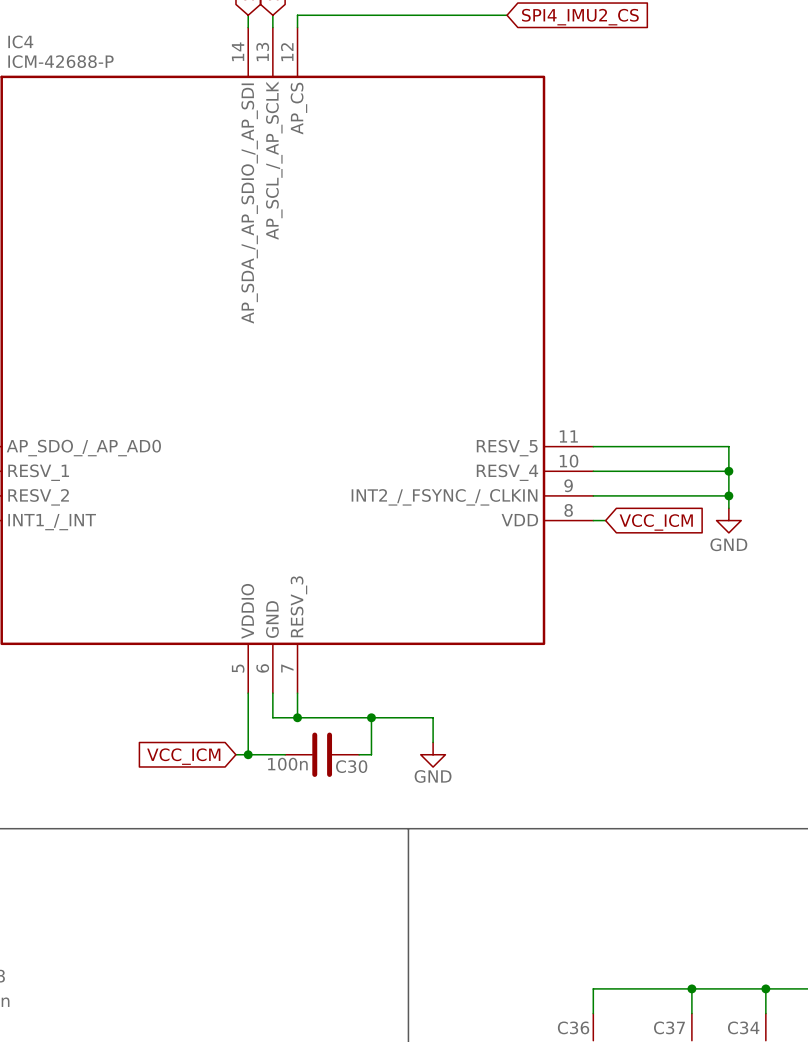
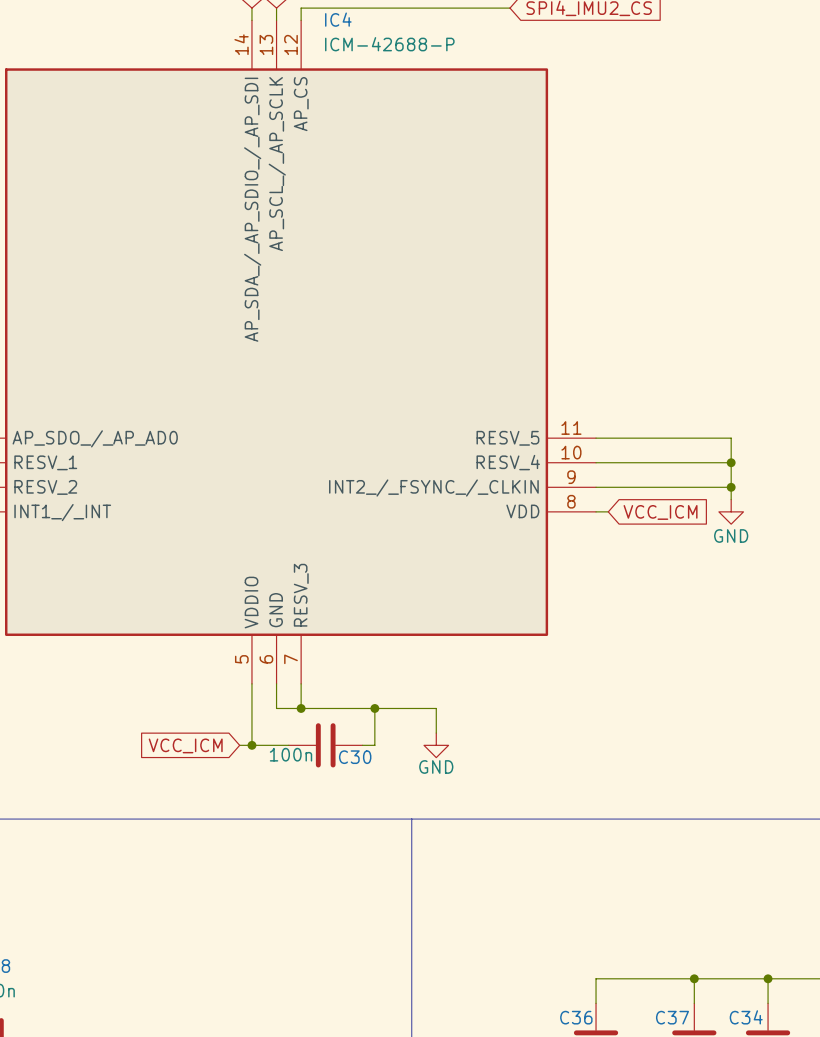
IC4 name position: IC4 (20, 41) -> IC4 (338, 19)
IC4 value position: ICM-42688-P (60, 61) -> ICM-42688-P (389, 44)

